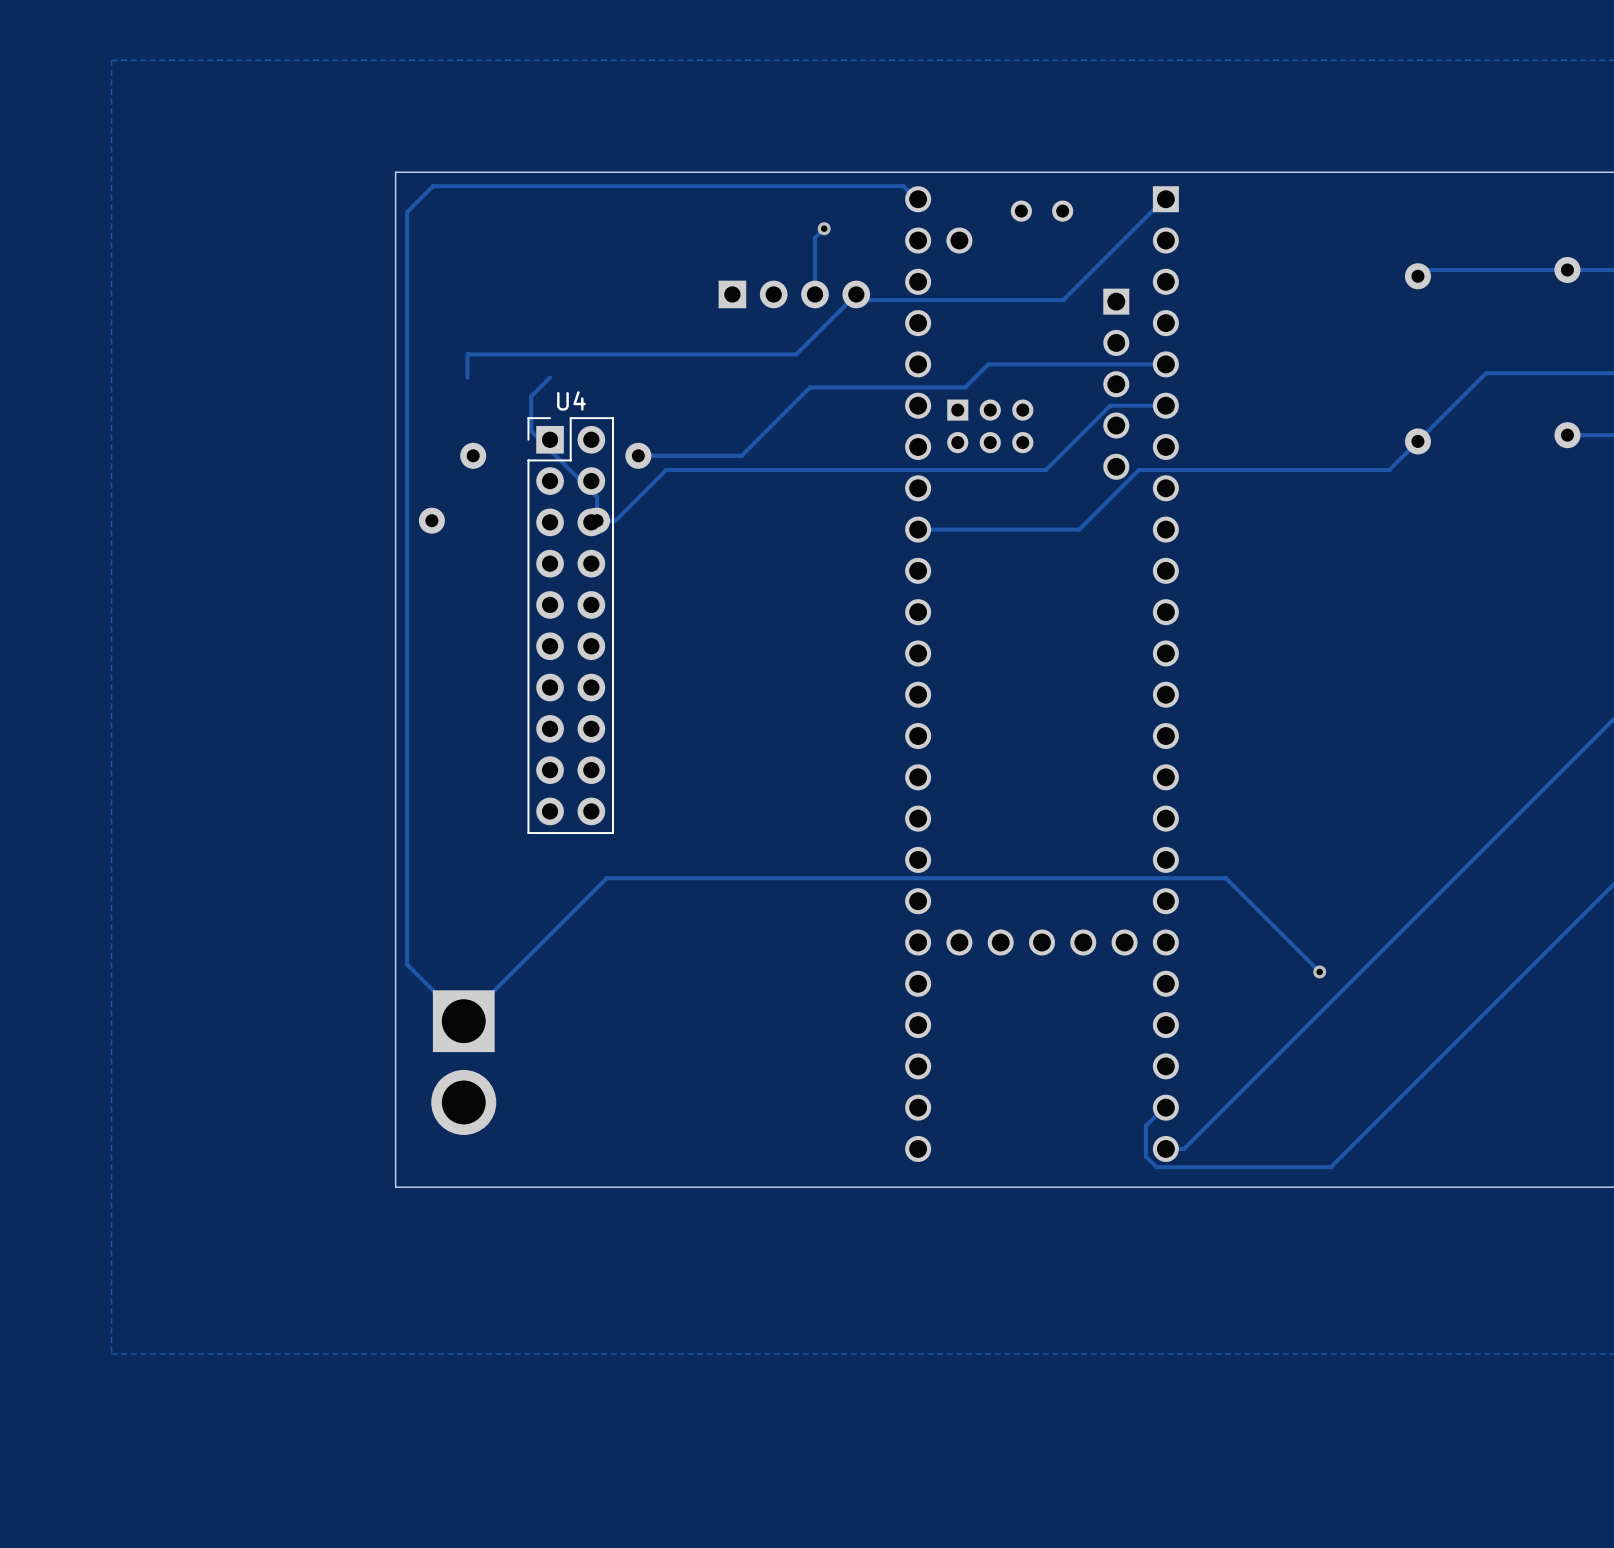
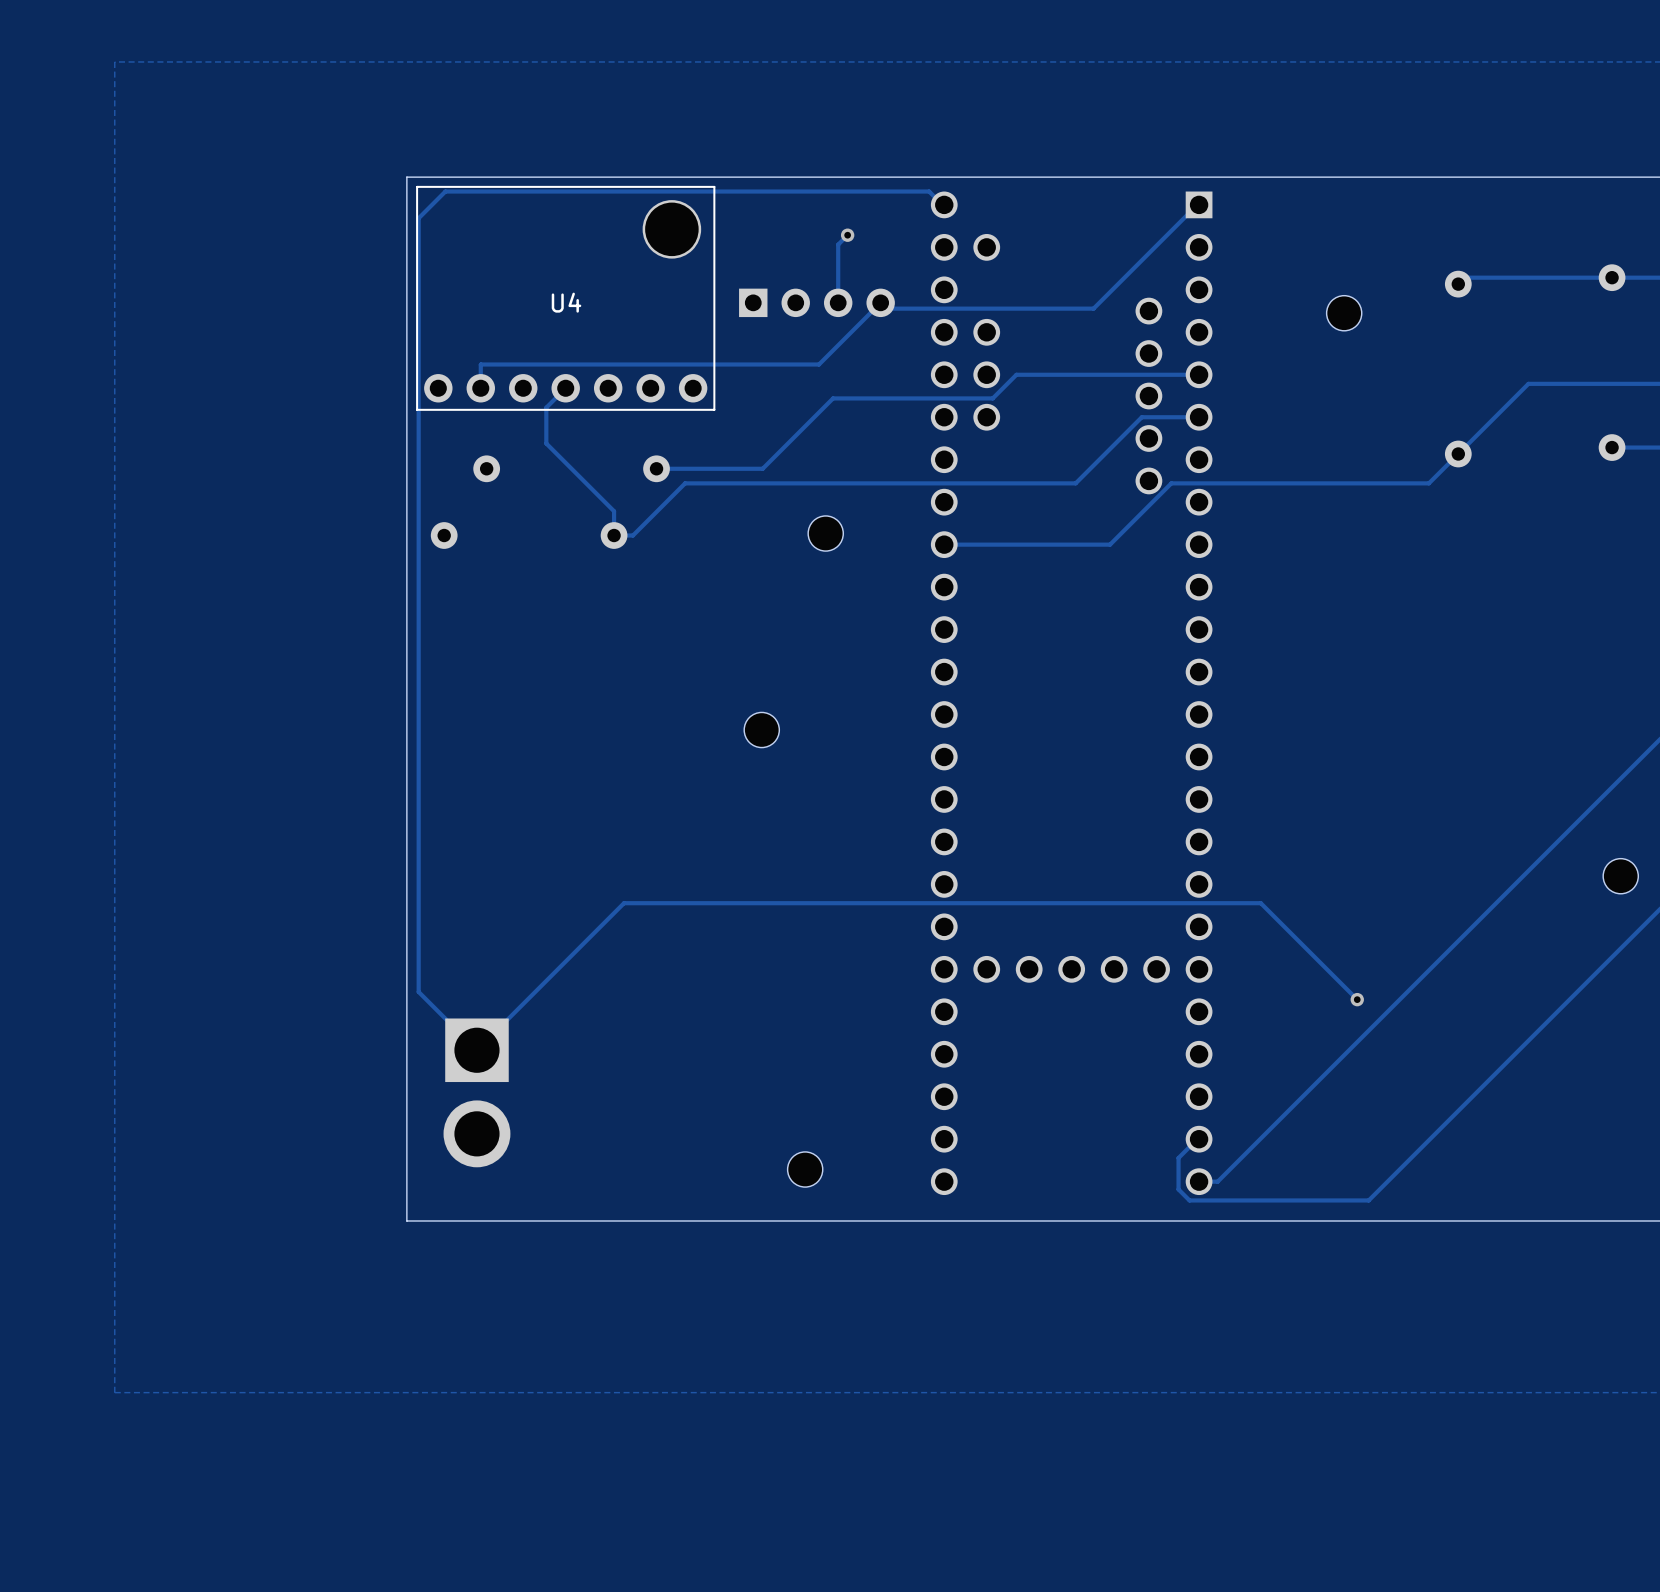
part footprint: [905, 186, 1179, 1162] -> [930, 191, 1213, 1196]
part: none -> (1344, 313)
U4 name position: U4 (571, 400) -> U4 (566, 302)
U4 footprint: [527, 417, 614, 835] -> [416, 185, 716, 411]
part: none -> (825, 533)
part: none -> (761, 730)
part: none -> (1620, 876)
part: none -> (805, 1169)

